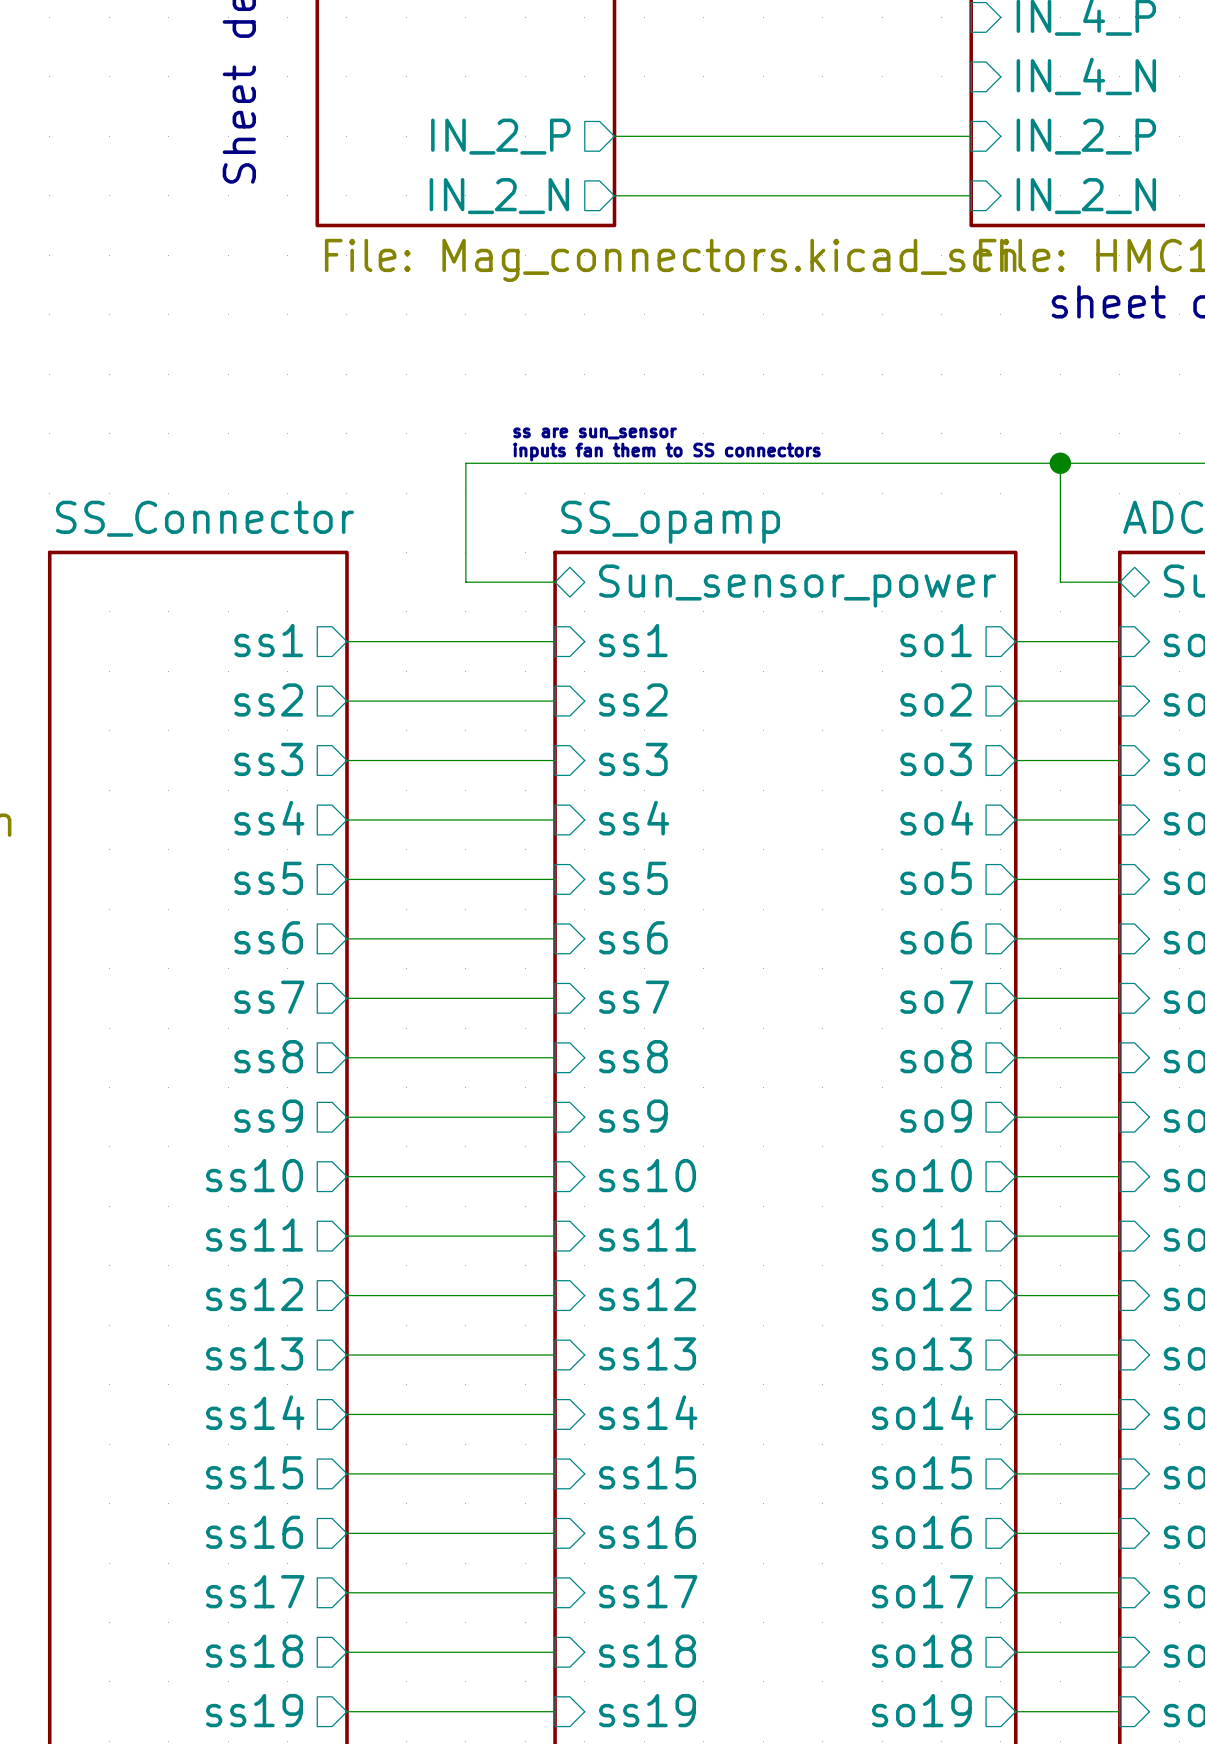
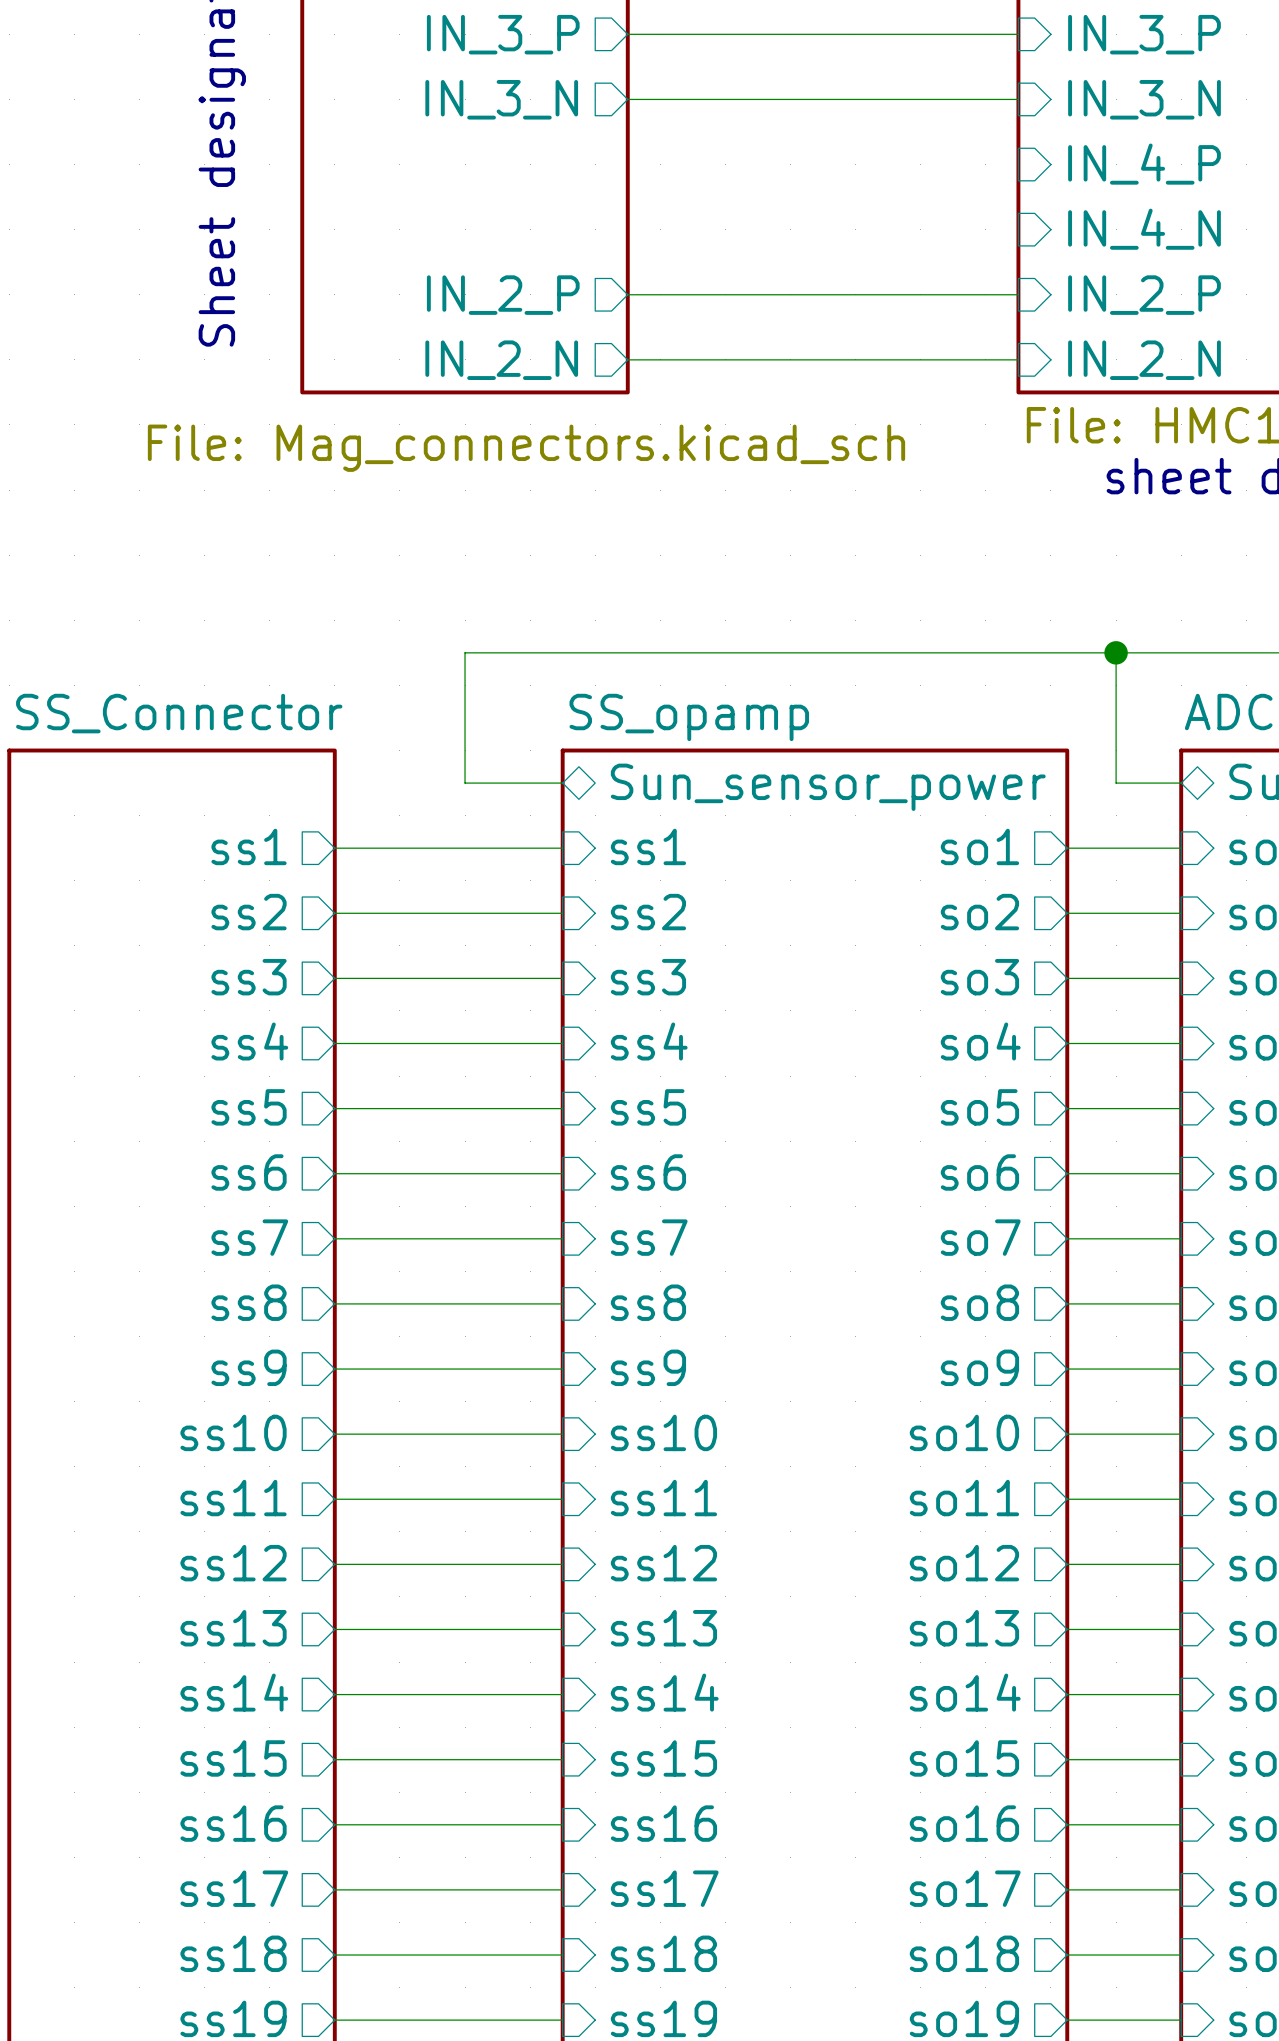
sheet value position: File: Mag_connectors.kicad_sch (670, 260) -> File: Mag_connectors.kicad_sch (526, 448)
text: ss are sun_sensor (595, 433) -> none
text: inputs fan them to SS connectors (666, 452) -> none

